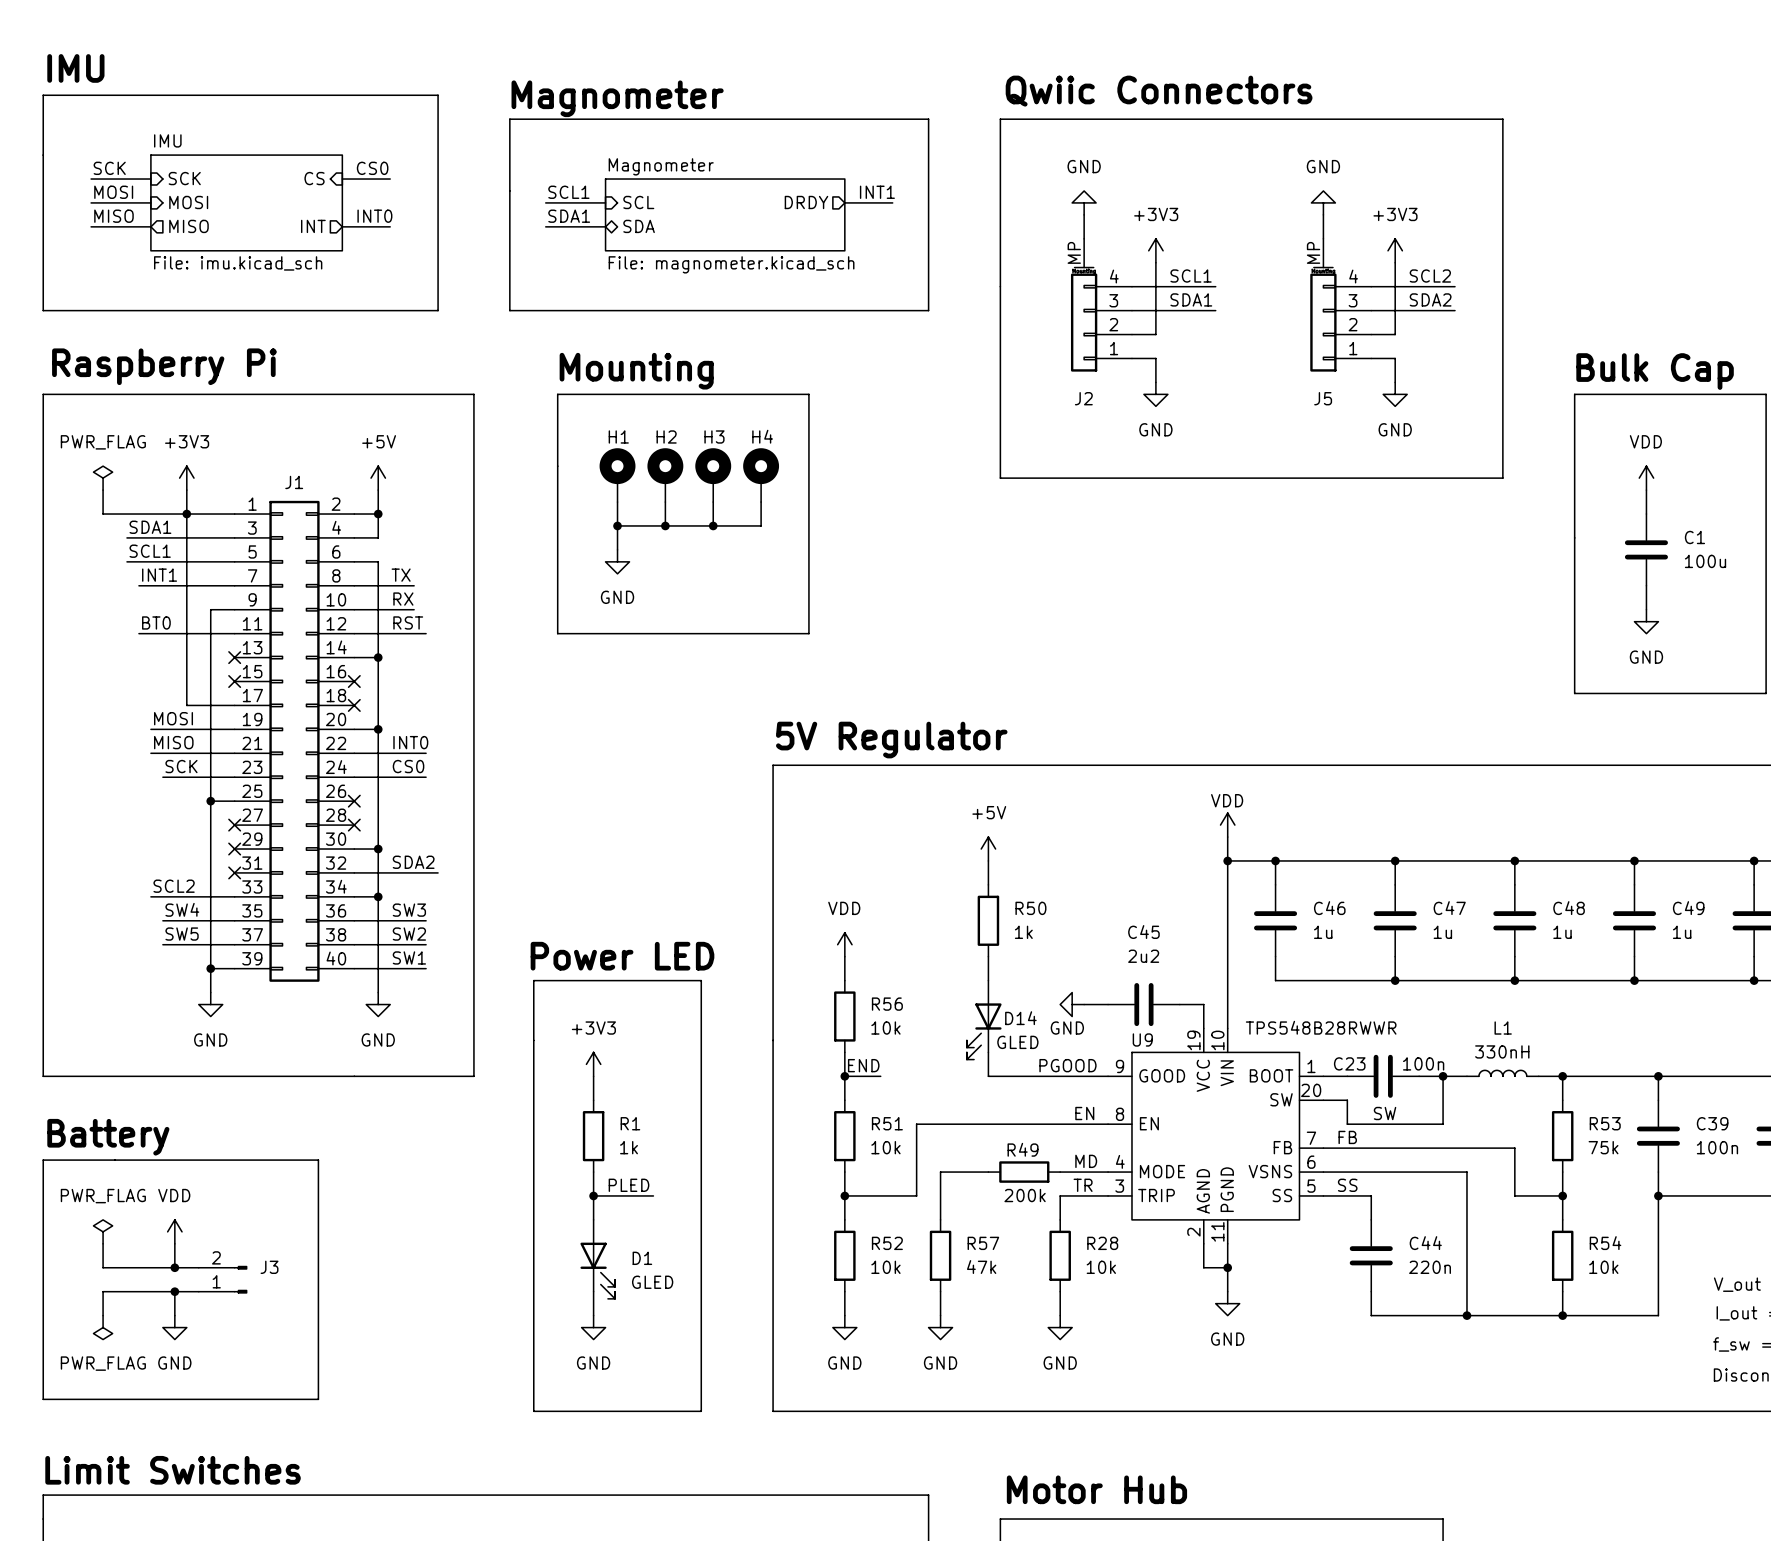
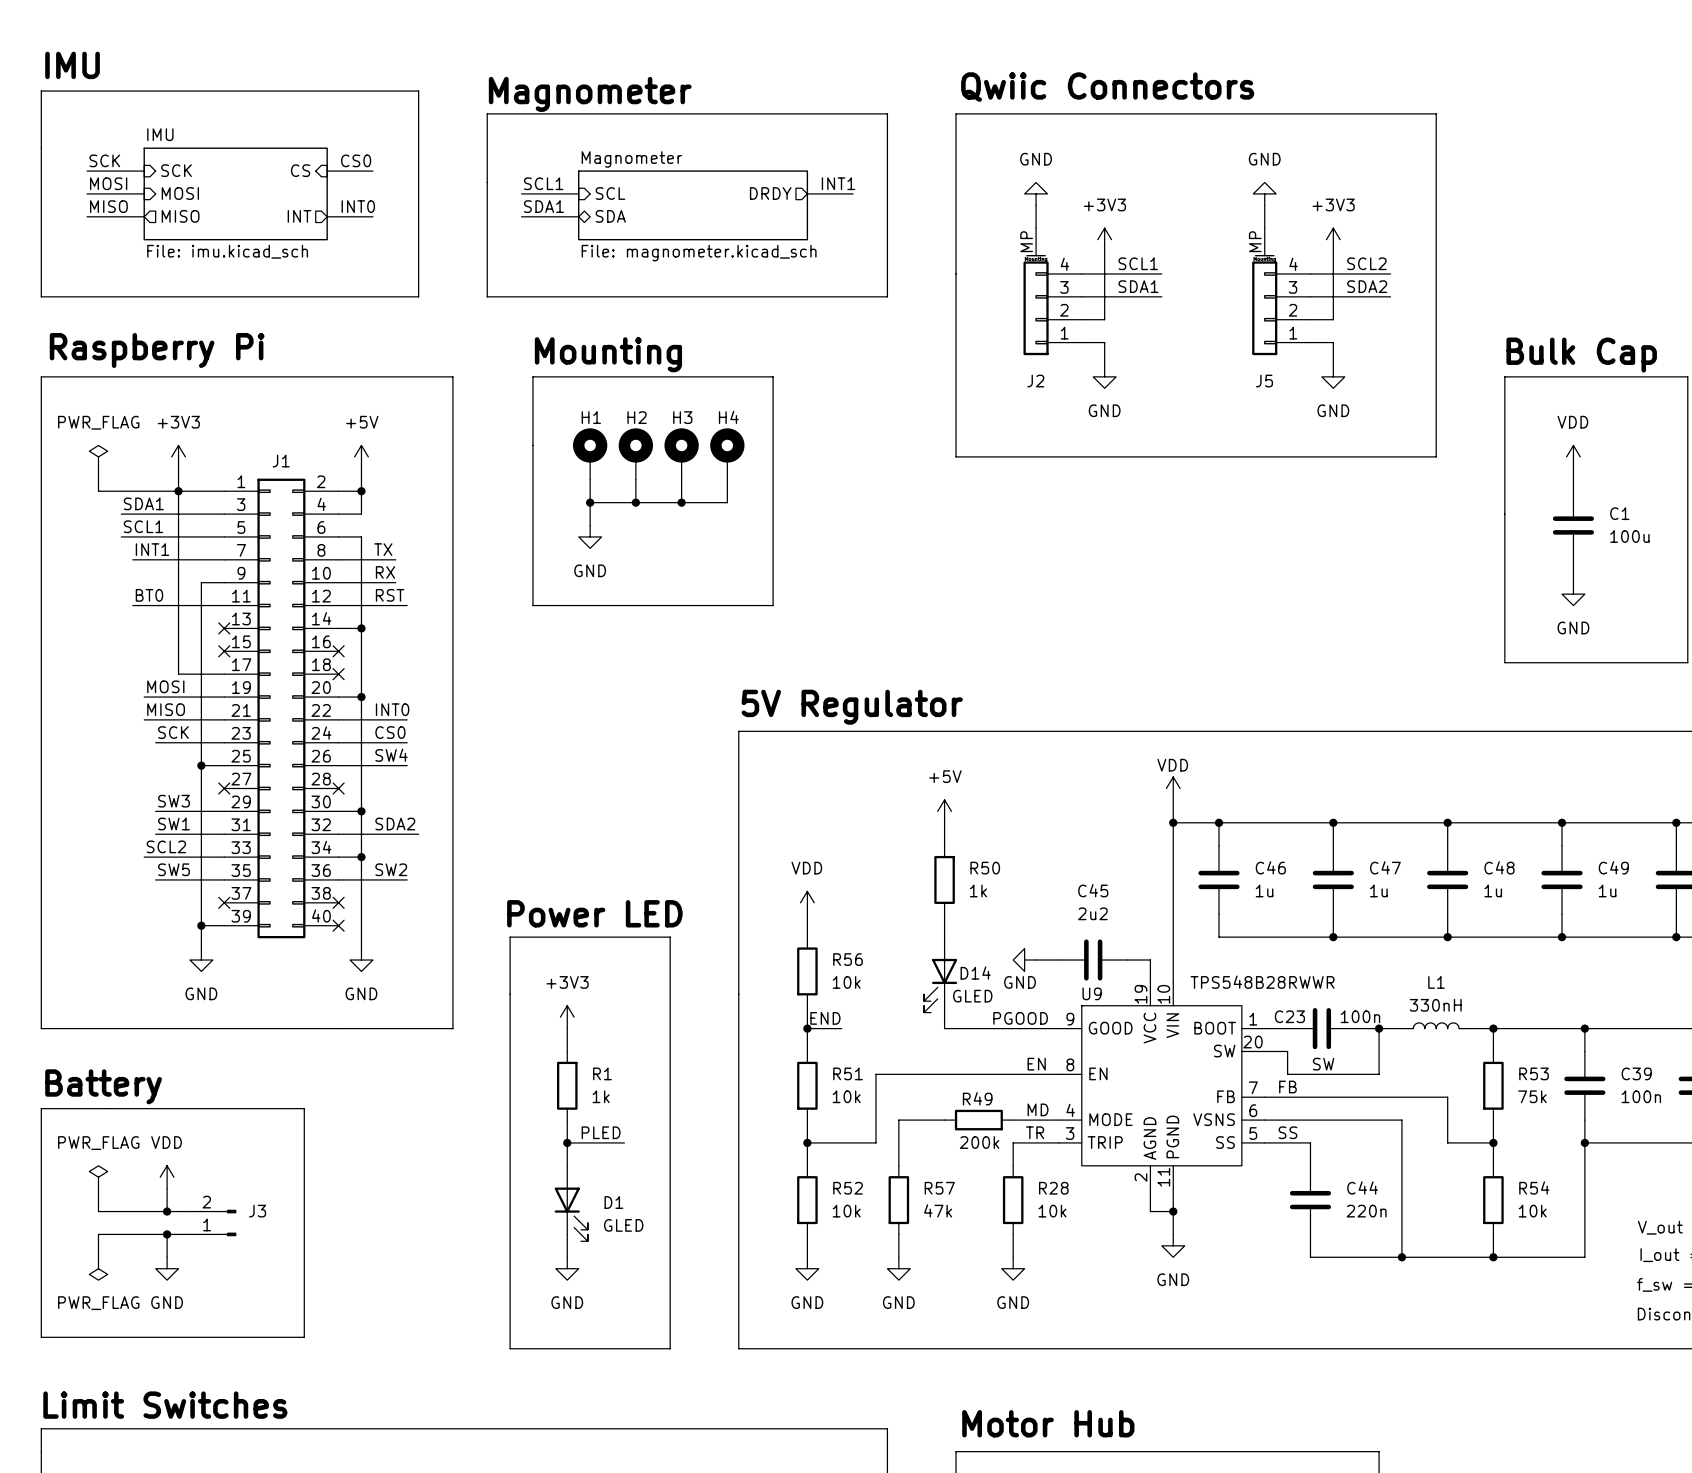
label: none -> SW4 (391, 755)
wire: none -> (338, 765) (407, 765)
no-connect mark: (354, 801) -> none
label: none -> SW3 (173, 801)
no-connect mark: (234, 849) -> none
label: none -> SW1 (173, 824)
no-connect mark: (234, 872) -> none
label: SW4 (182, 909) -> SW5 (173, 869)
label: SW3 (409, 910) -> SW2 (391, 869)
label: SW5 (182, 934) -> none
label: SW2 (409, 934) -> none
wire: (162, 944) (234, 944) -> none
no-connect mark: none -> (224, 902)
wire: (354, 944) (426, 944) -> (155, 811) (224, 811)
no-connect mark: none -> (338, 902)
label: SW1 (409, 957) -> none
wire: (354, 968) (426, 968) -> (155, 834) (224, 834)
no-connect mark: none -> (338, 925)

